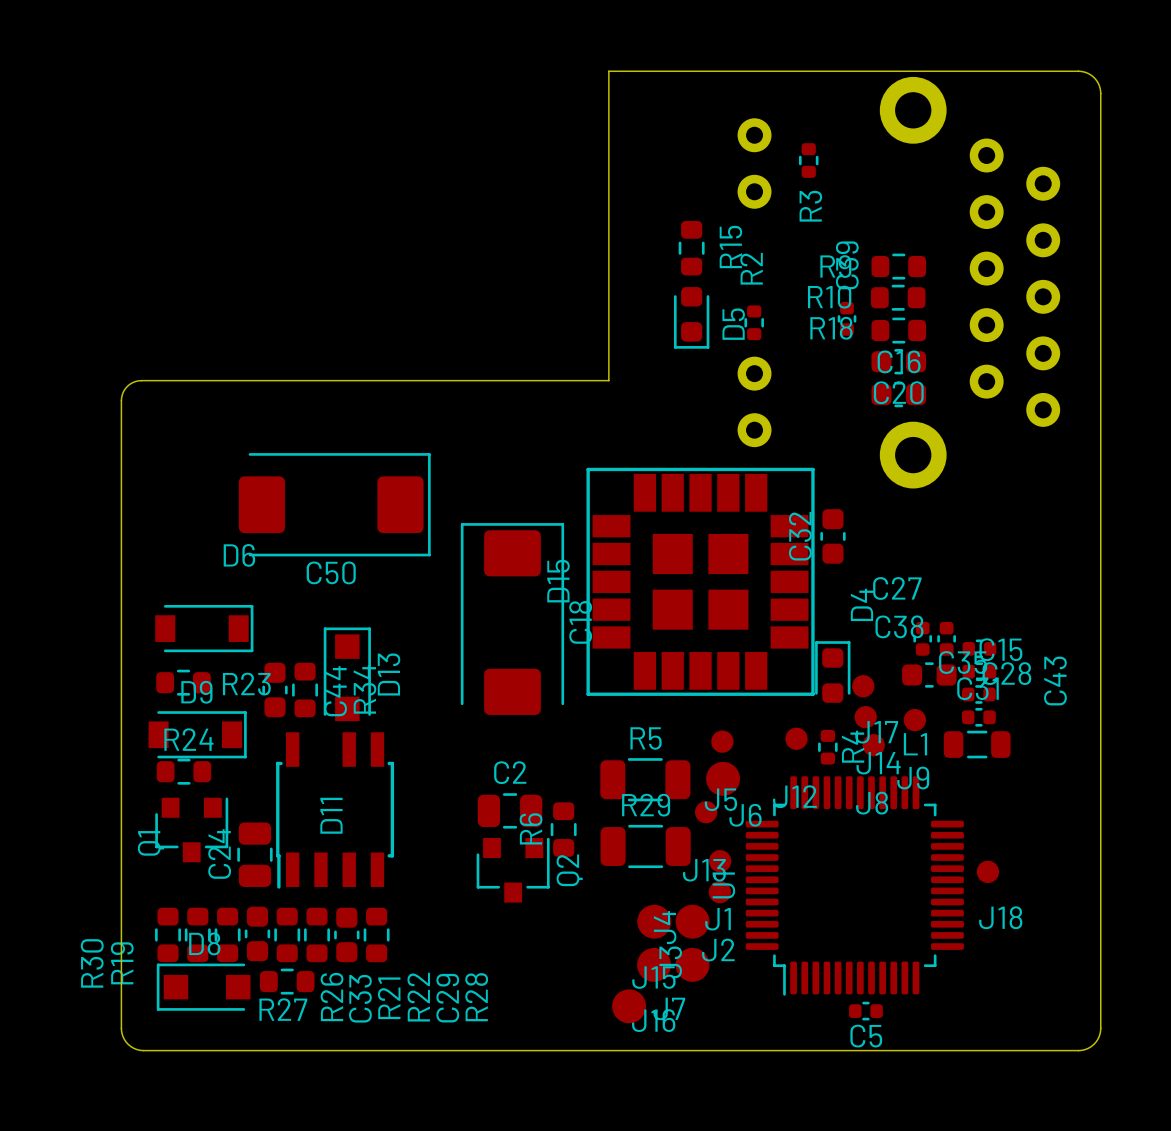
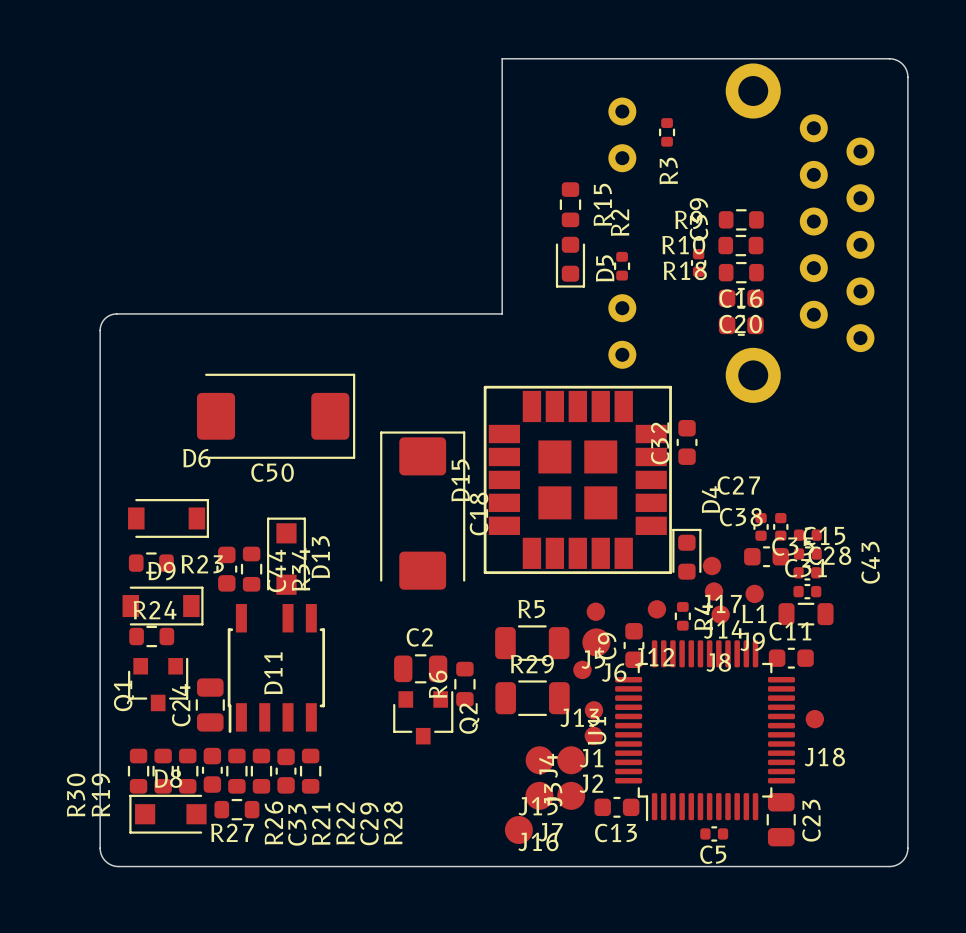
C9: none -> (634, 645)
C11: none -> (791, 658)
C13: none -> (616, 807)
C23: none -> (781, 819)

